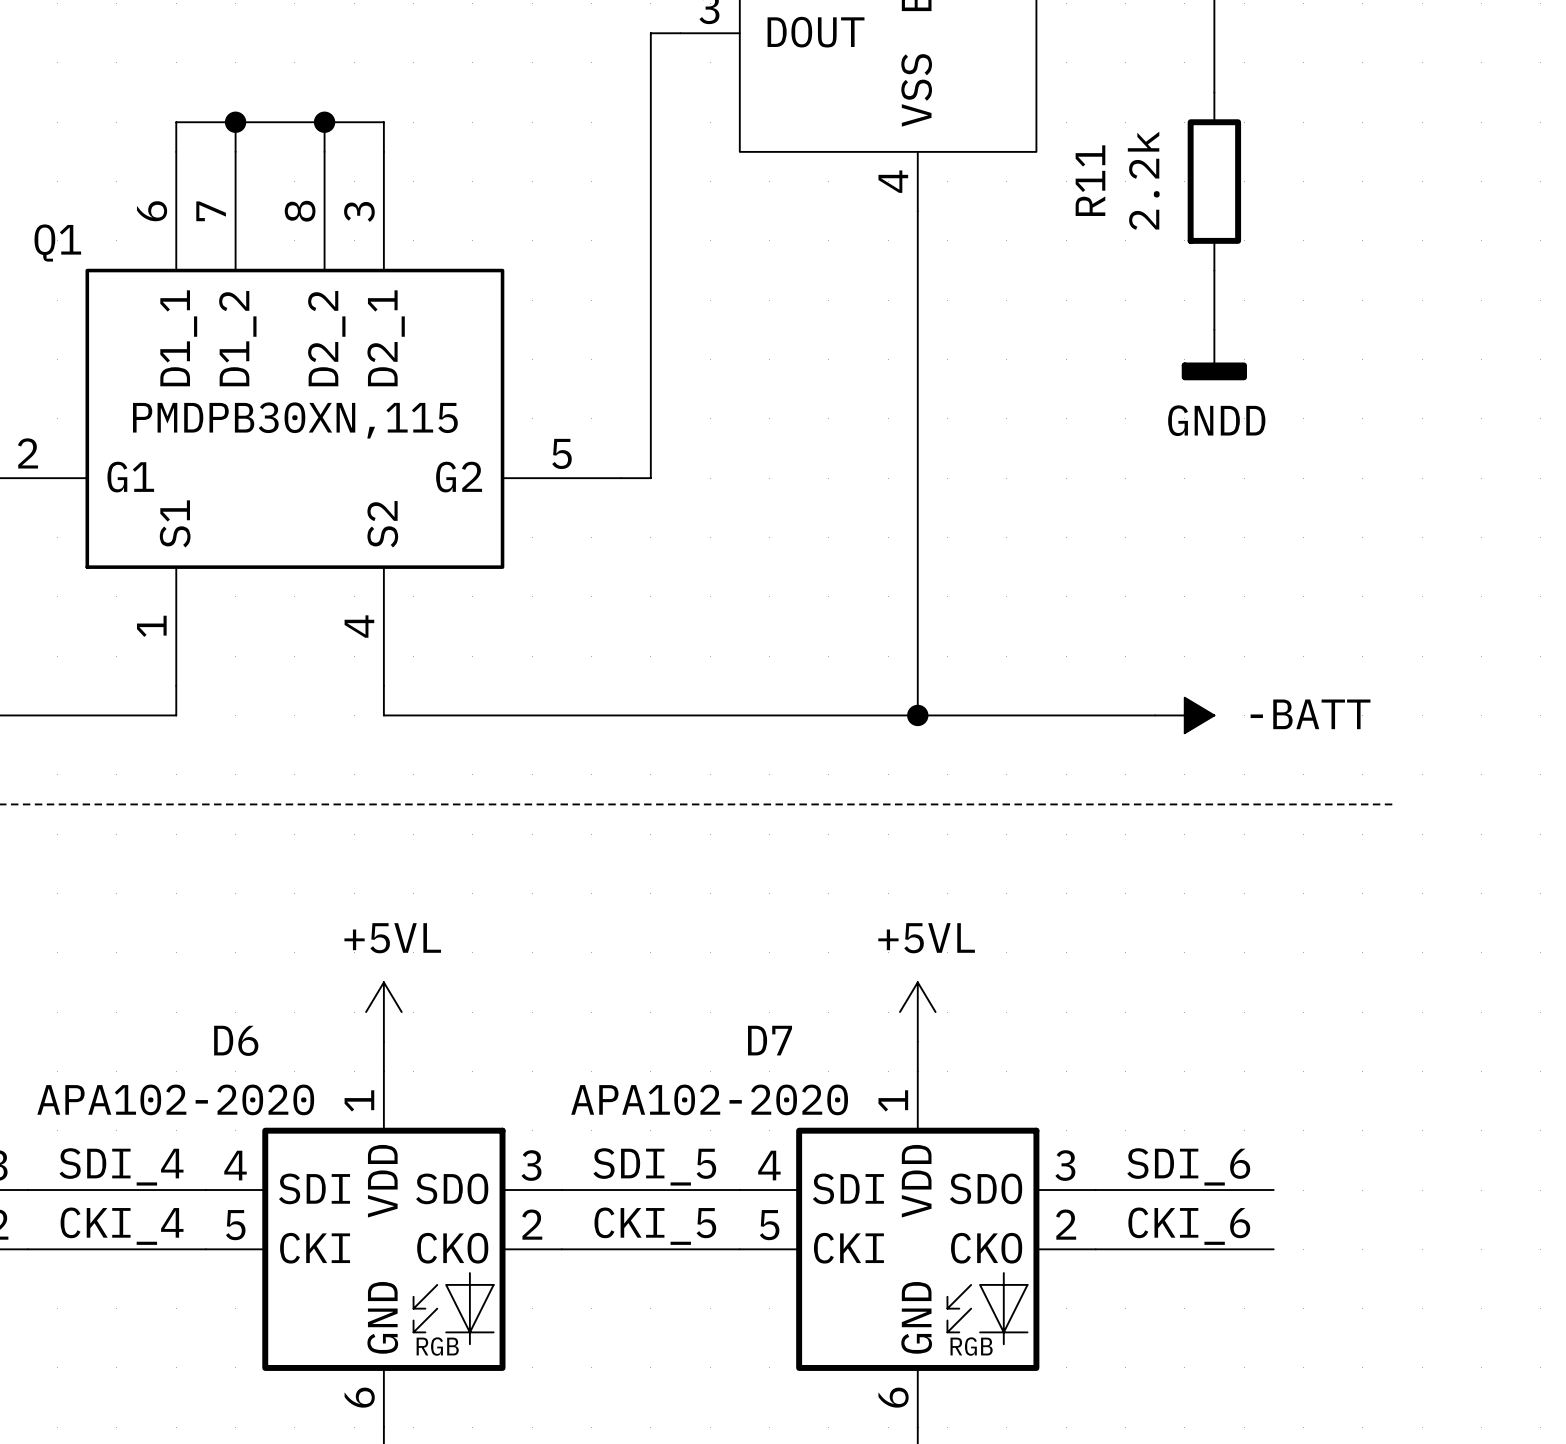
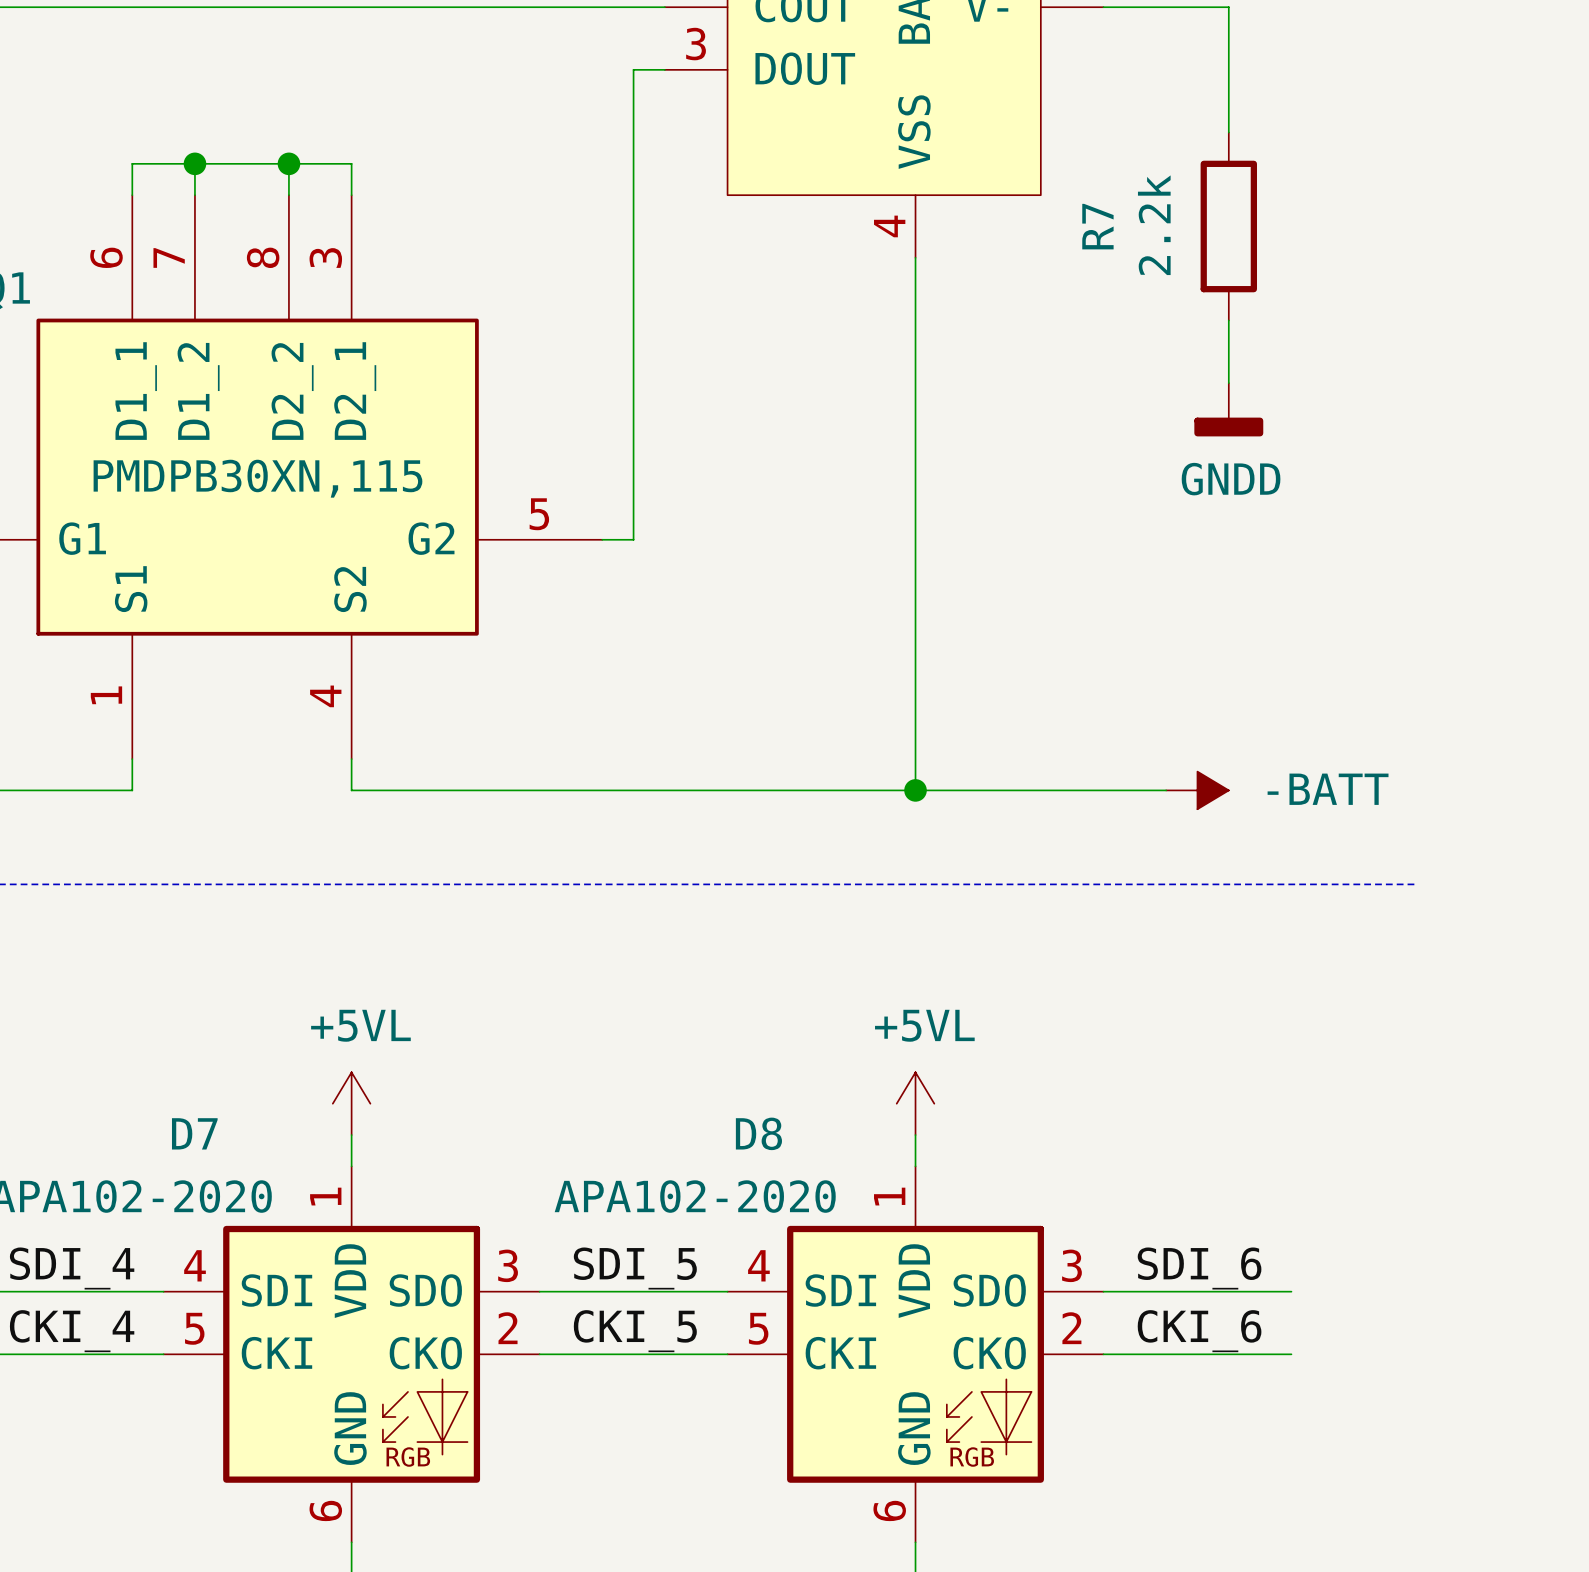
R11 name: R11 (1090, 180) -> R7 (1097, 226)
D6 name: D6 (236, 1040) -> D7 (194, 1133)
D7 name: D7 (770, 1040) -> D8 (758, 1133)

